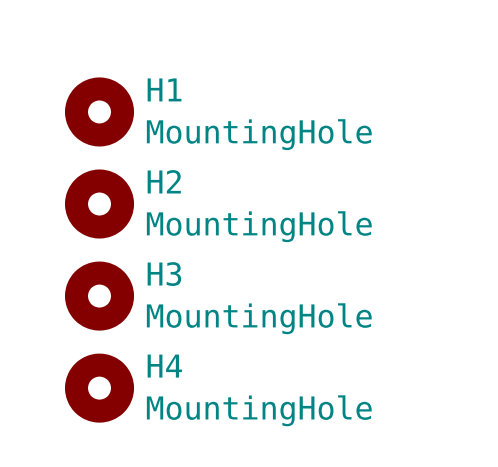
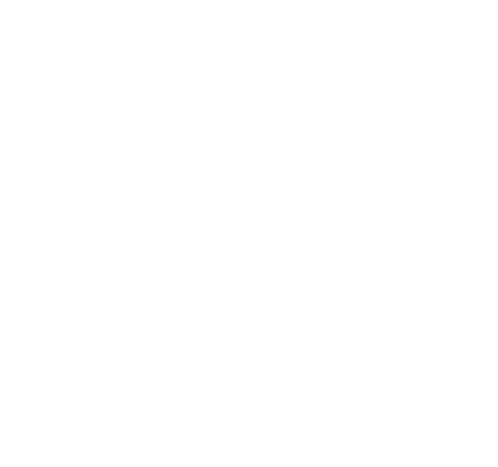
H1: MountingHole (99, 111) -> none
H2: MountingHole (99, 204) -> none
H3: MountingHole (99, 296) -> none
H4: MountingHole (99, 388) -> none

